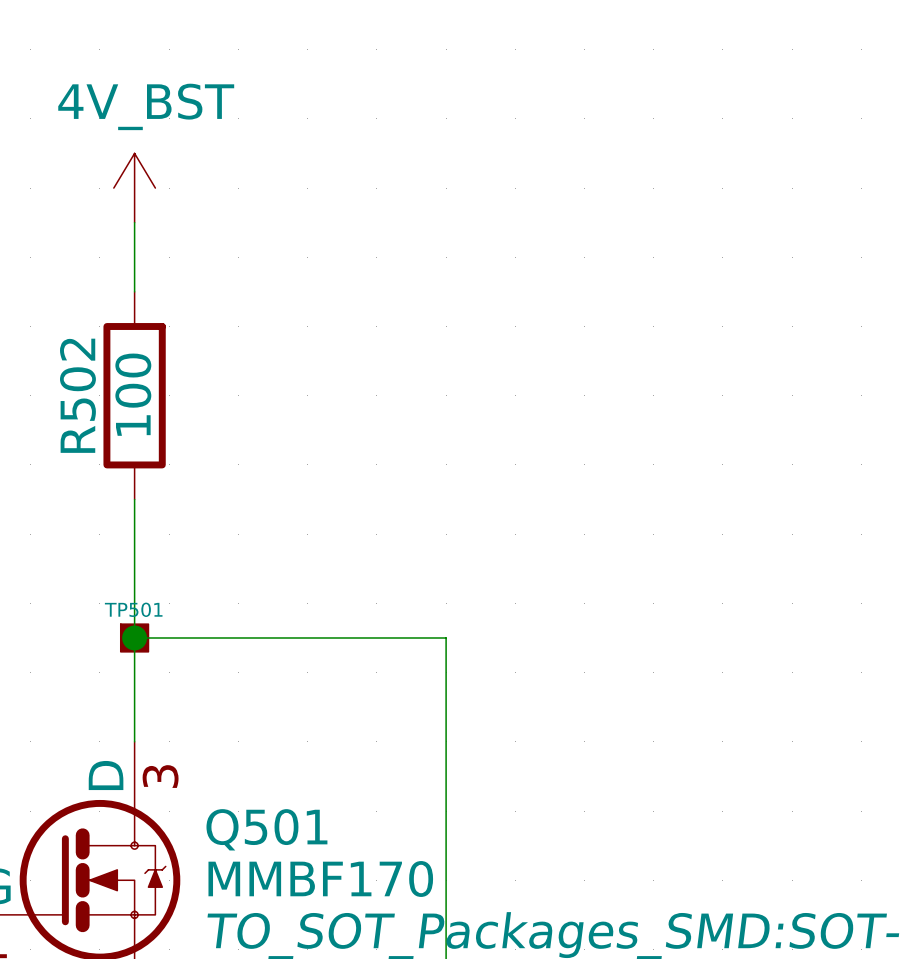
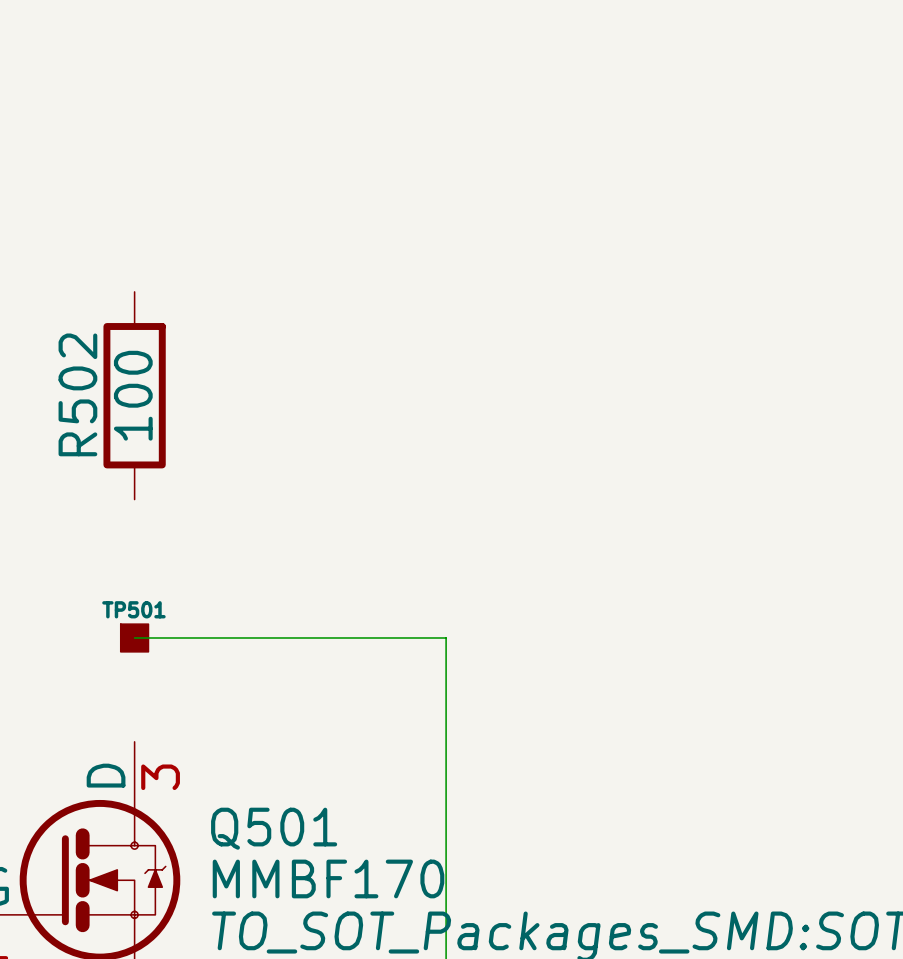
power symbol: 4V_BST (134, 188) -> none
wire: (134, 222) (134, 291) -> none
wire: (134, 499) (134, 741) -> none
junction: (134, 637) -> none

